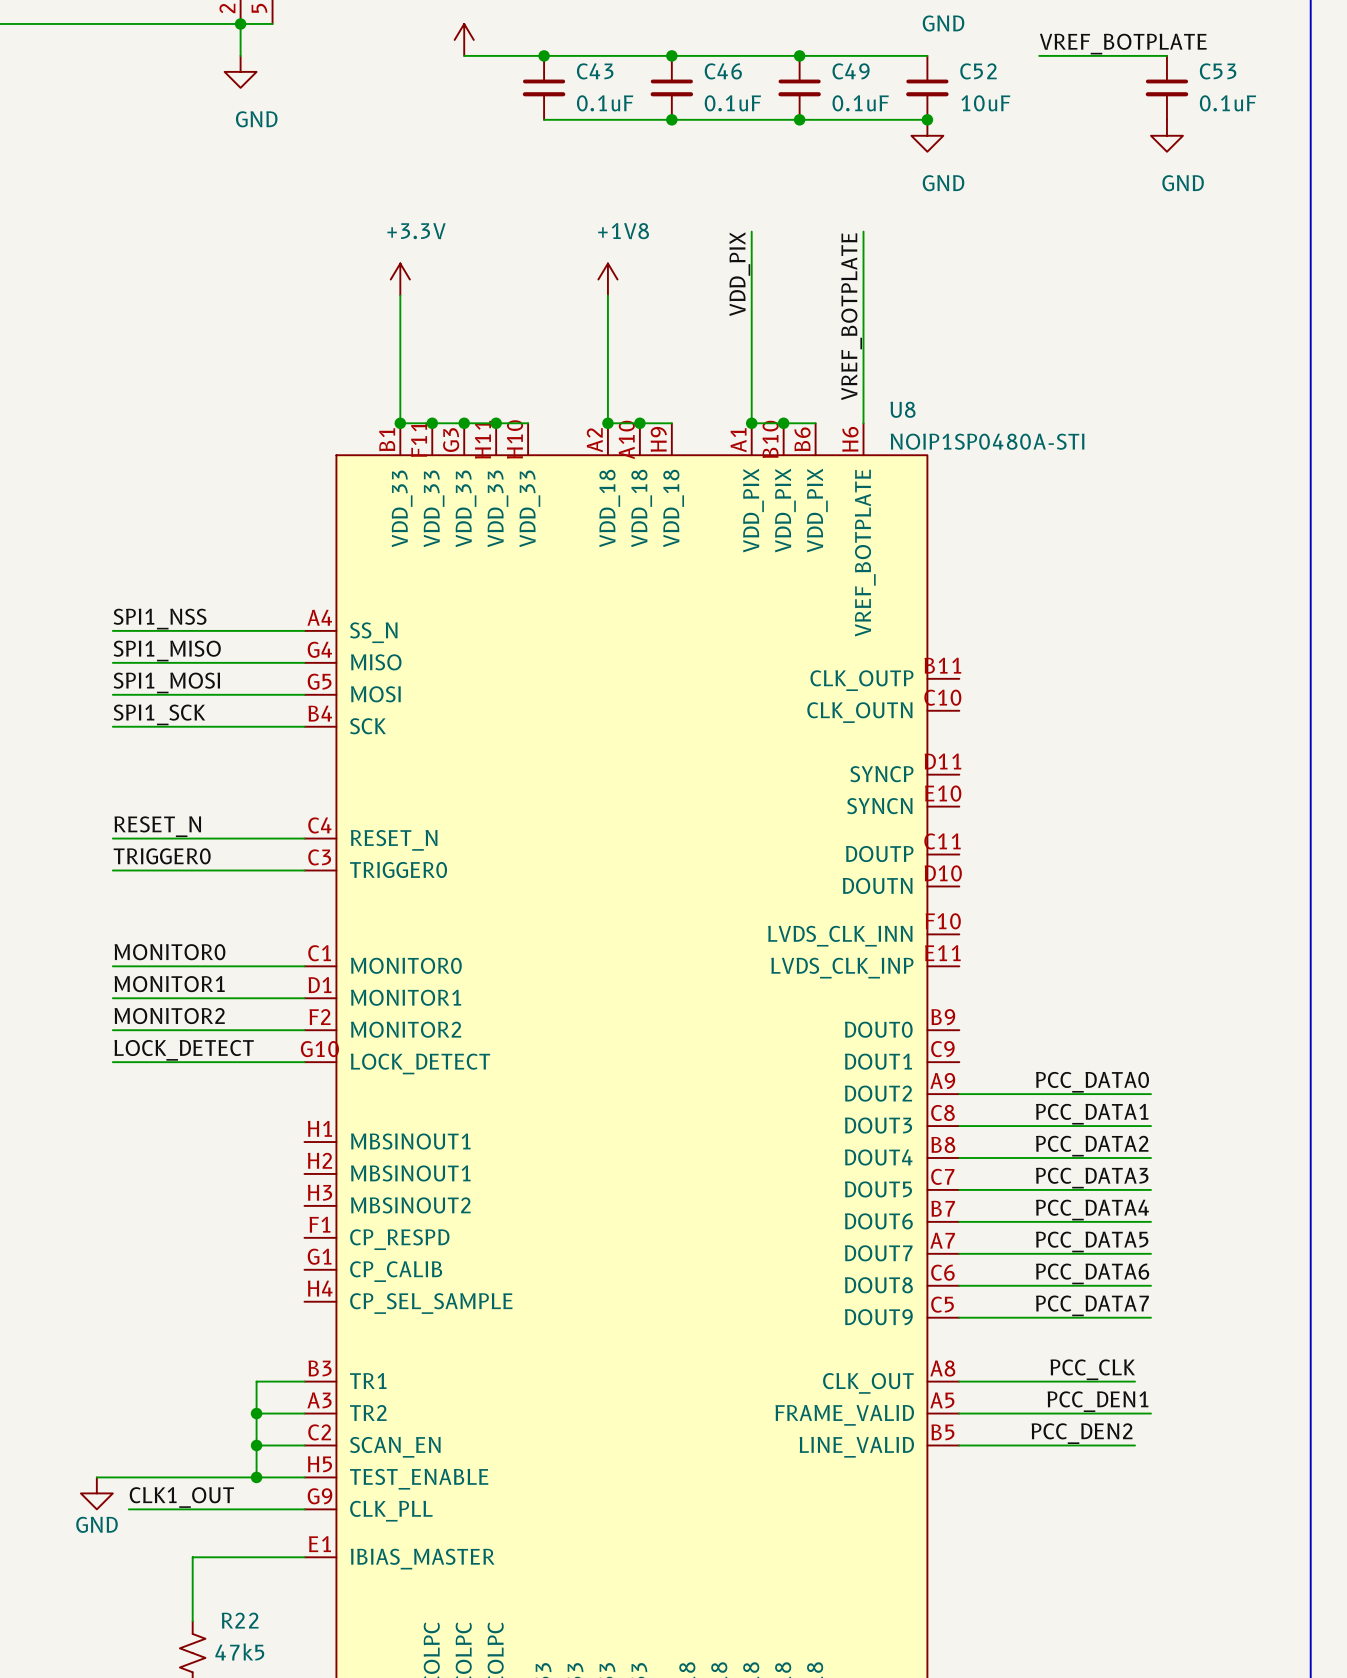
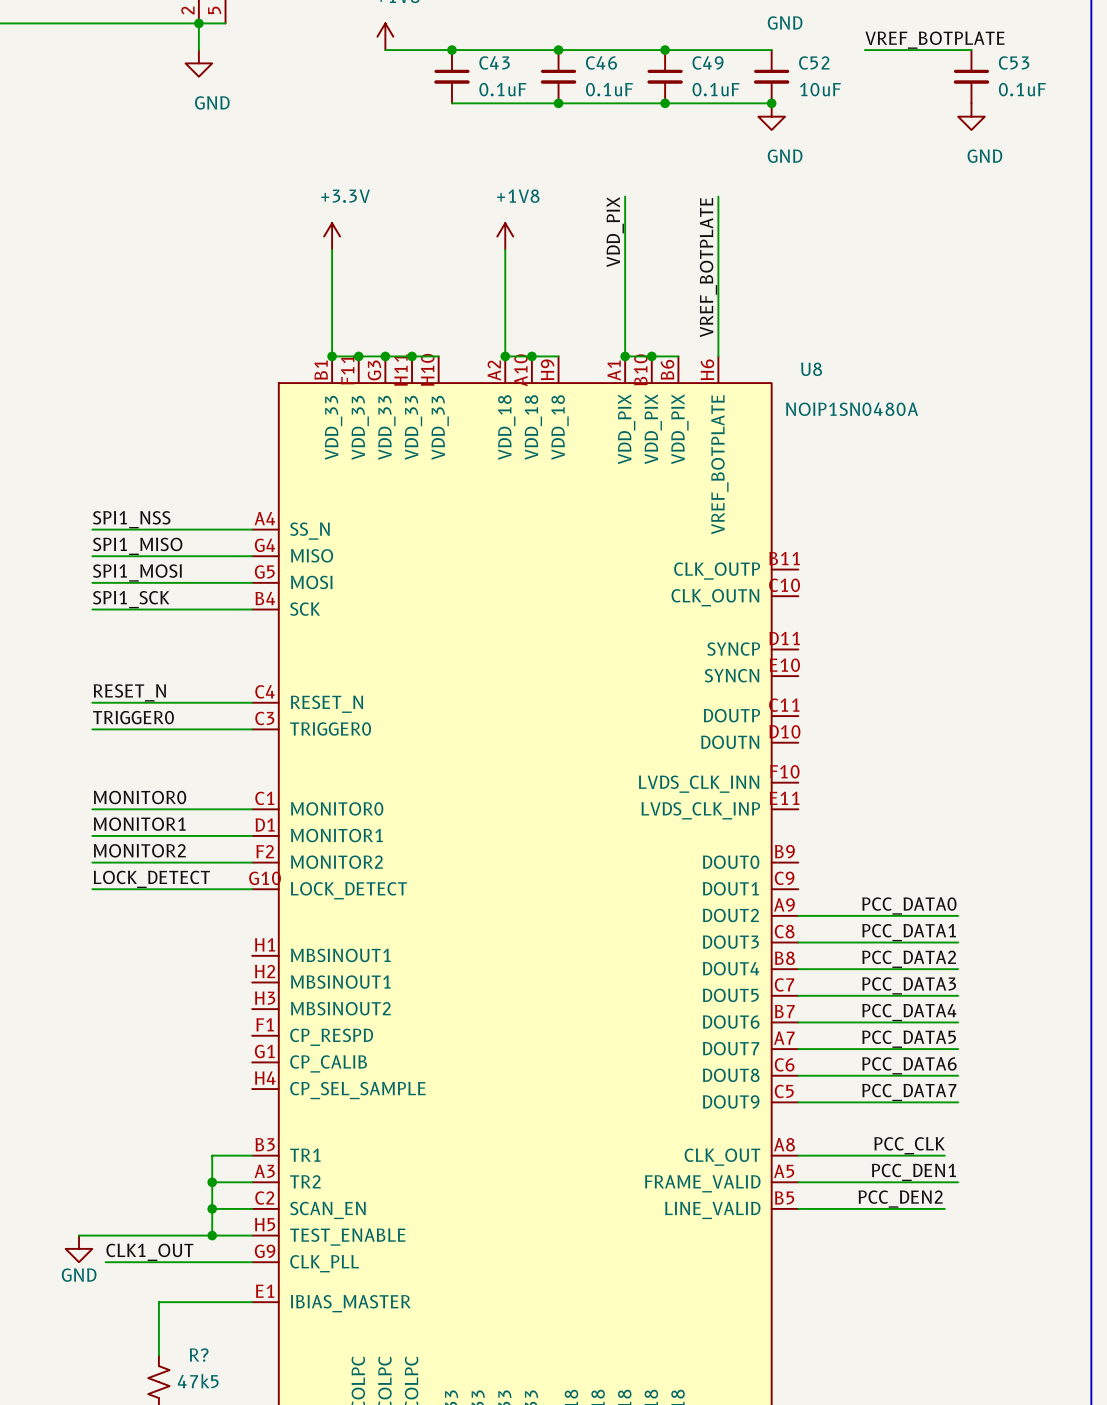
U8 name position: U8 (902, 409) -> U8 (811, 369)
U8 value: NOIP1SP0480A-STI (987, 441) -> NOIP1SN0480A (852, 409)
R22 name: R22 (240, 1620) -> R? (199, 1355)

